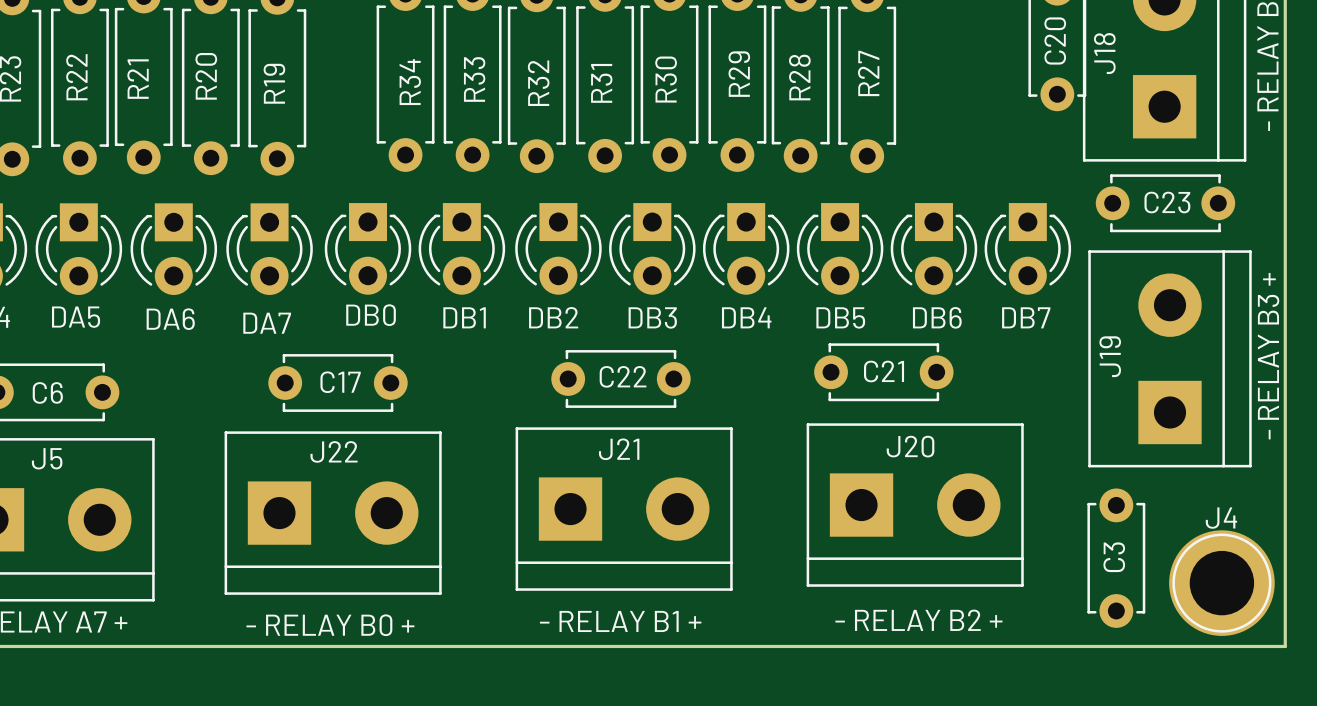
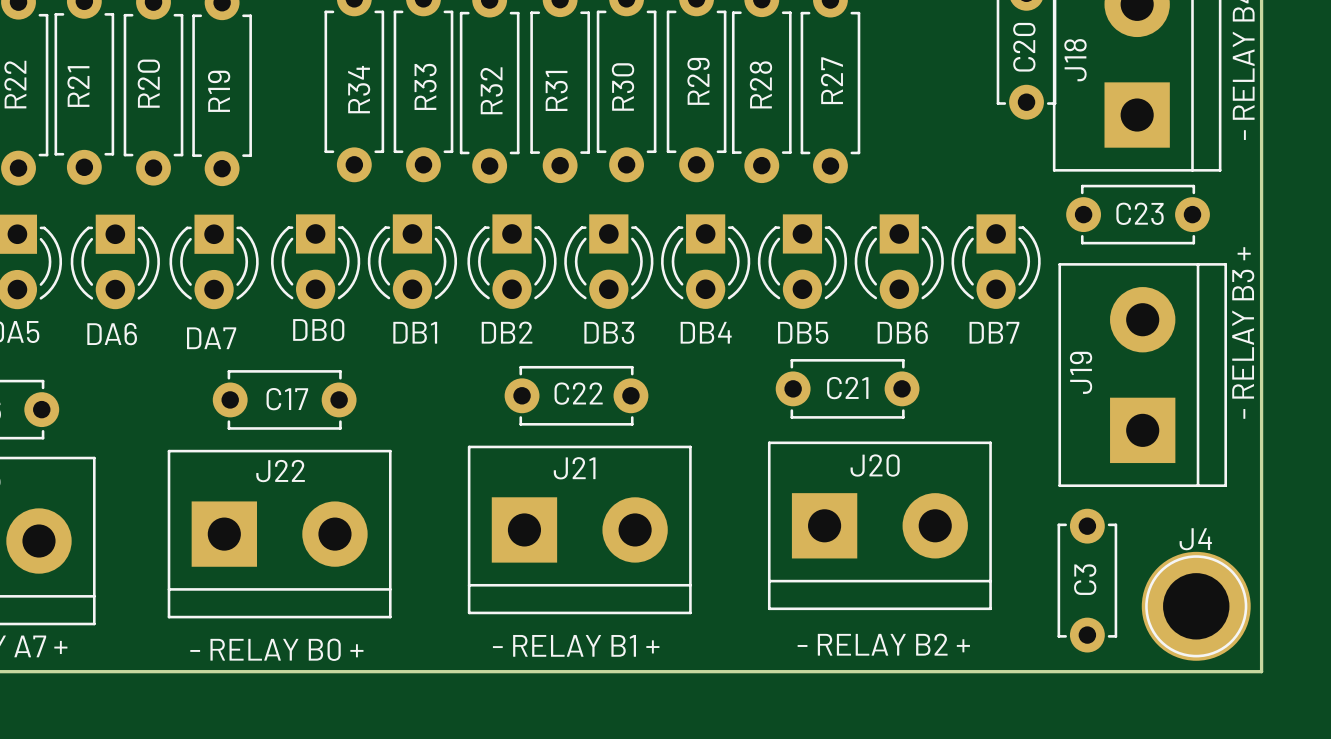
text position: - RELAY B3 + (1268, 356) -> - RELAY B3 + (1243, 332)

